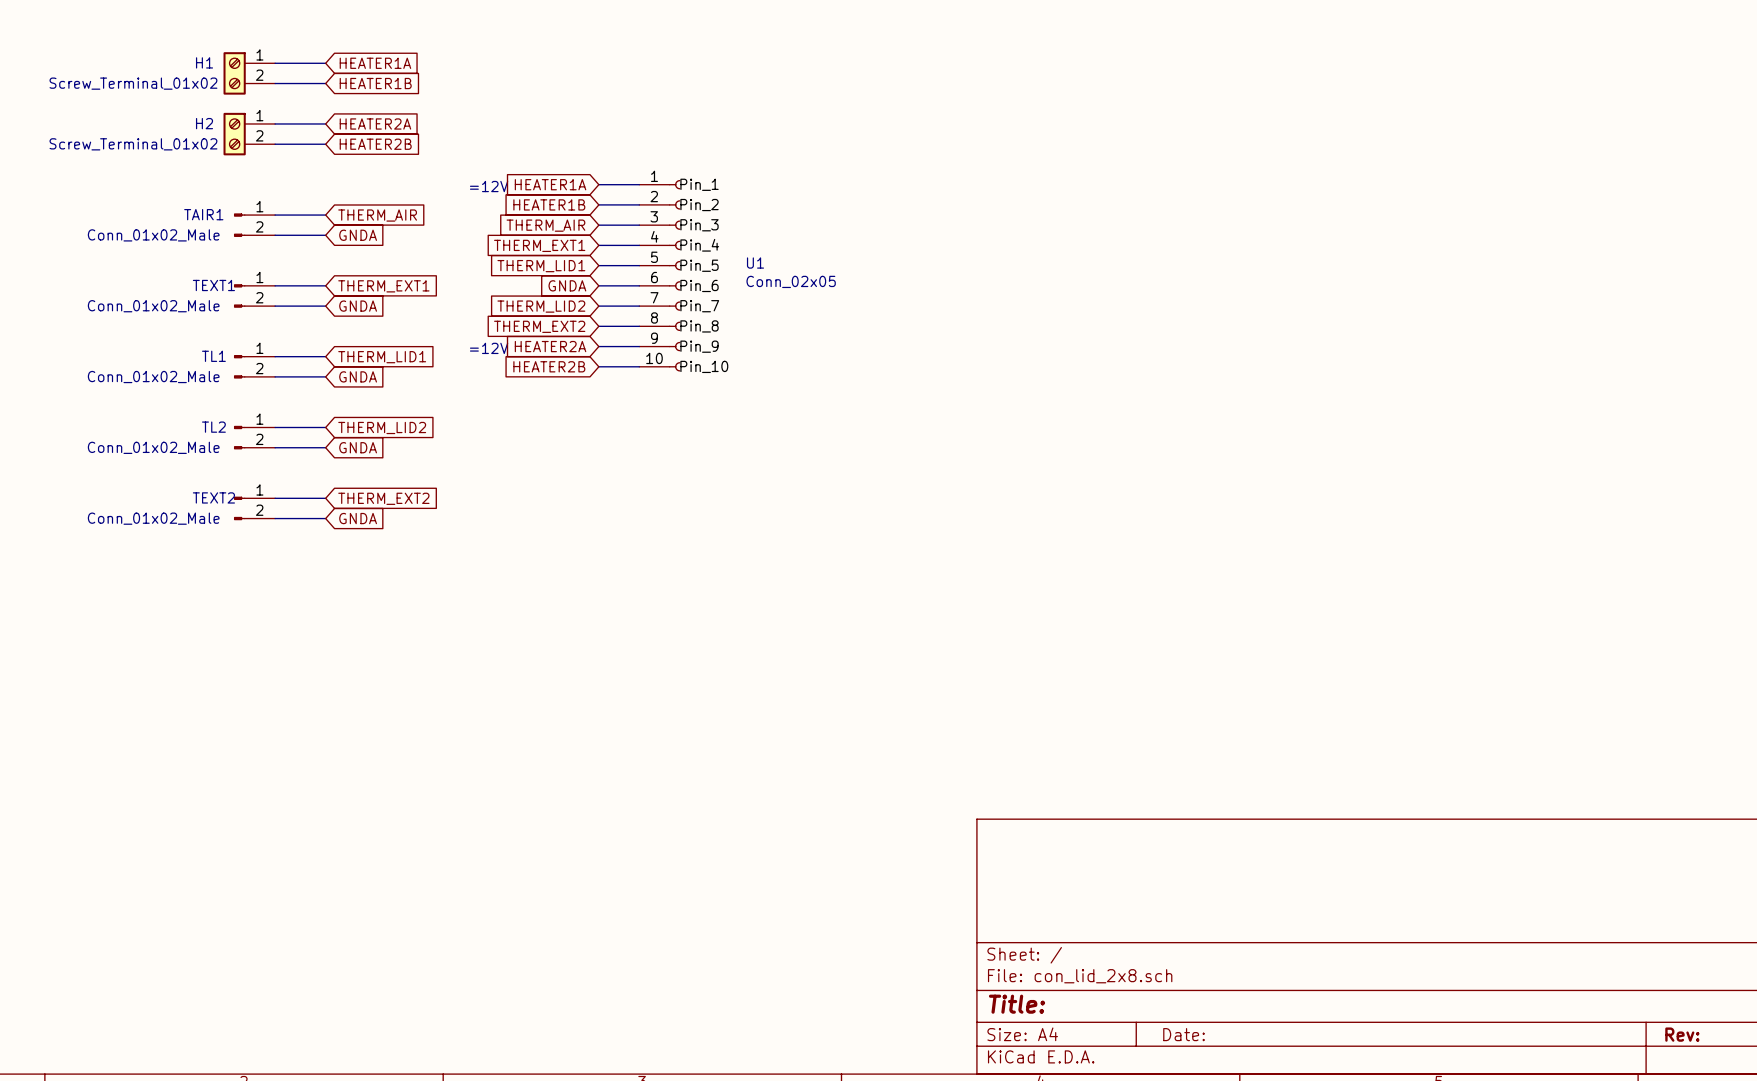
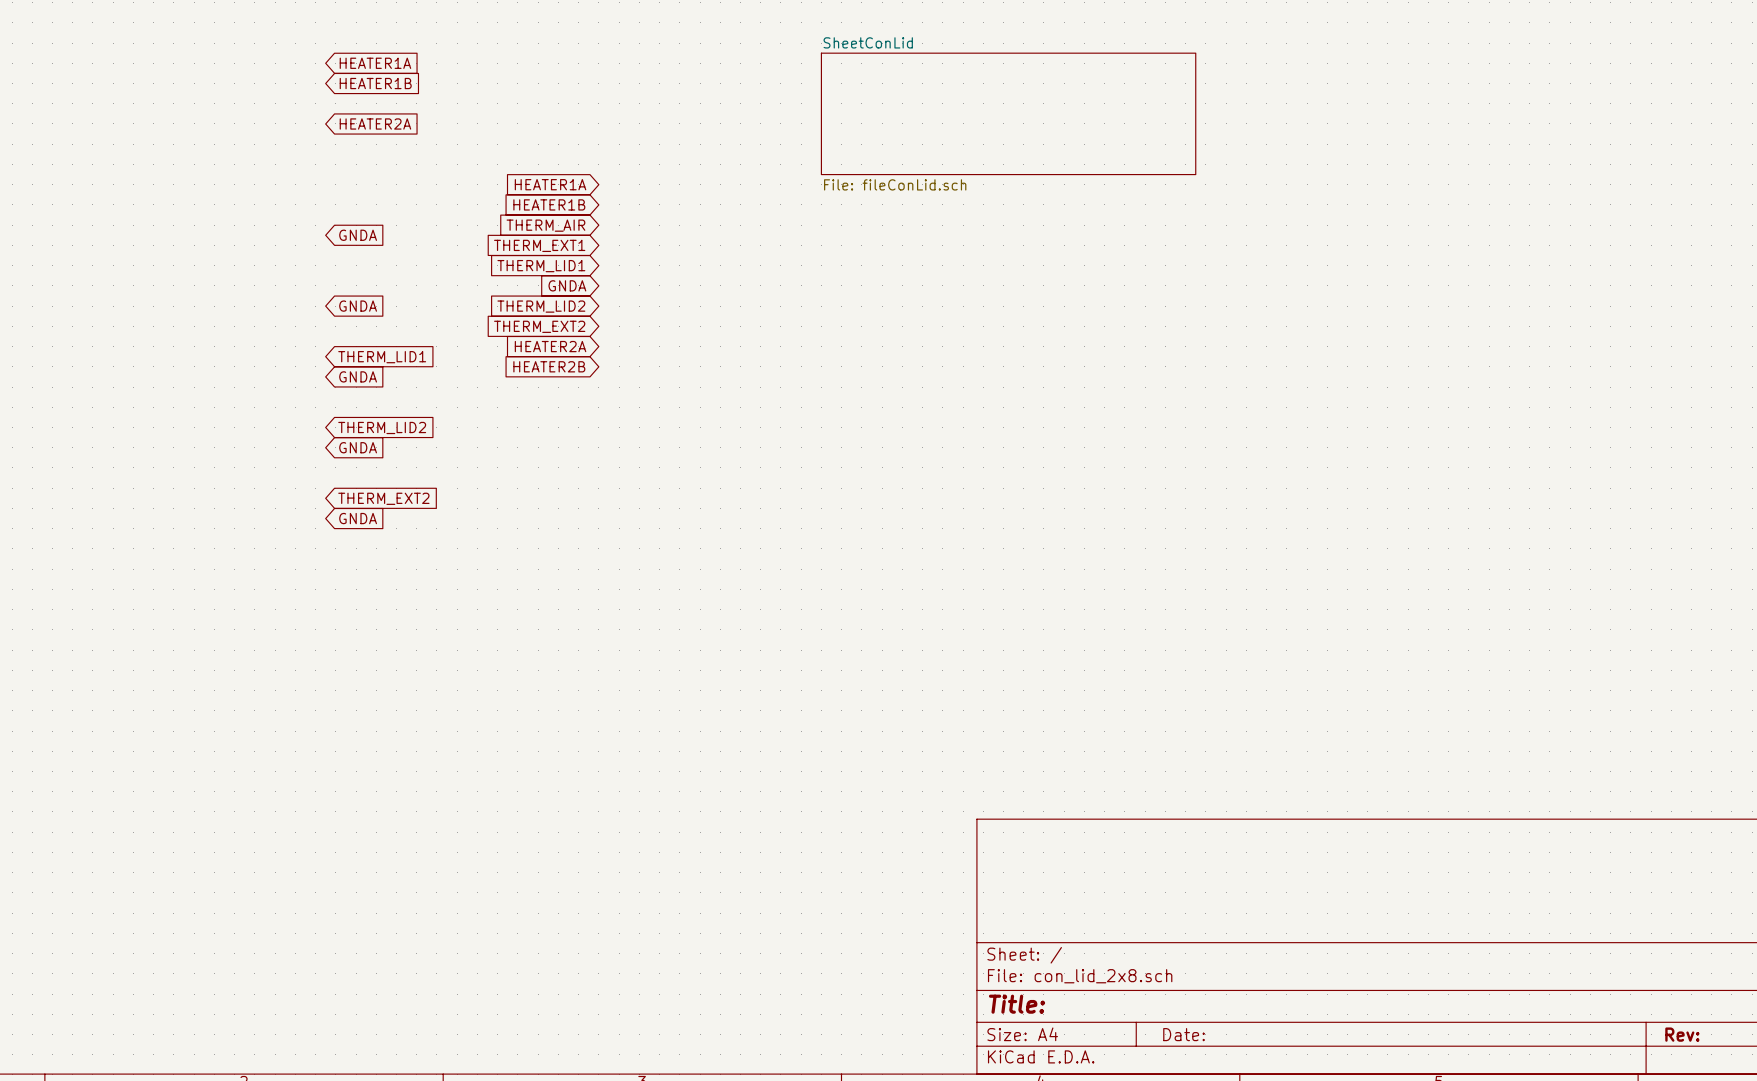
wire: (275, 63) (325, 63) -> none
H1: Screw_Terminal_01x02 (249, 73) -> none
wire: (275, 83) (325, 83) -> none
sheet SheetConLid: none -> File: fileConLid.sch (1008, 113)
wire: (275, 123) (325, 123) -> none
H2: Screw_Terminal_01x02 (249, 134) -> none
wire: (275, 144) (325, 144) -> none
global label: HEATER2B (375, 144) -> none
wire: (598, 184) (639, 184) -> none
text: =12V (489, 186) -> none
wire: (598, 204) (639, 204) -> none
wire: (275, 215) (325, 215) -> none
global label: THERM_AIR (377, 215) -> none
TAIR1: Conn_01x02_Male (254, 225) -> none
wire: (598, 225) (639, 225) -> none
wire: (275, 235) (325, 235) -> none
wire: (598, 245) (639, 245) -> none
wire: (598, 265) (639, 265) -> none
U1: Conn_02x05 (659, 275) -> none
wire: (275, 285) (325, 285) -> none
wire: (598, 285) (639, 285) -> none
global label: THERM_EXT1 (383, 286) -> none
TEXT1: Conn_01x02_Male (254, 295) -> none
wire: (275, 306) (325, 306) -> none
wire: (598, 306) (639, 306) -> none
wire: (598, 326) (639, 326) -> none
wire: (598, 346) (639, 346) -> none
text: =12V (489, 348) -> none
wire: (275, 356) (325, 356) -> none
TL1: Conn_01x02_Male (254, 366) -> none
wire: (598, 366) (639, 366) -> none
wire: (275, 376) (325, 376) -> none
wire: (275, 427) (325, 427) -> none
TL2: Conn_01x02_Male (254, 437) -> none
wire: (275, 447) (325, 447) -> none
wire: (275, 498) (325, 498) -> none
TEXT2: Conn_01x02_Male (254, 508) -> none
wire: (275, 518) (325, 518) -> none

